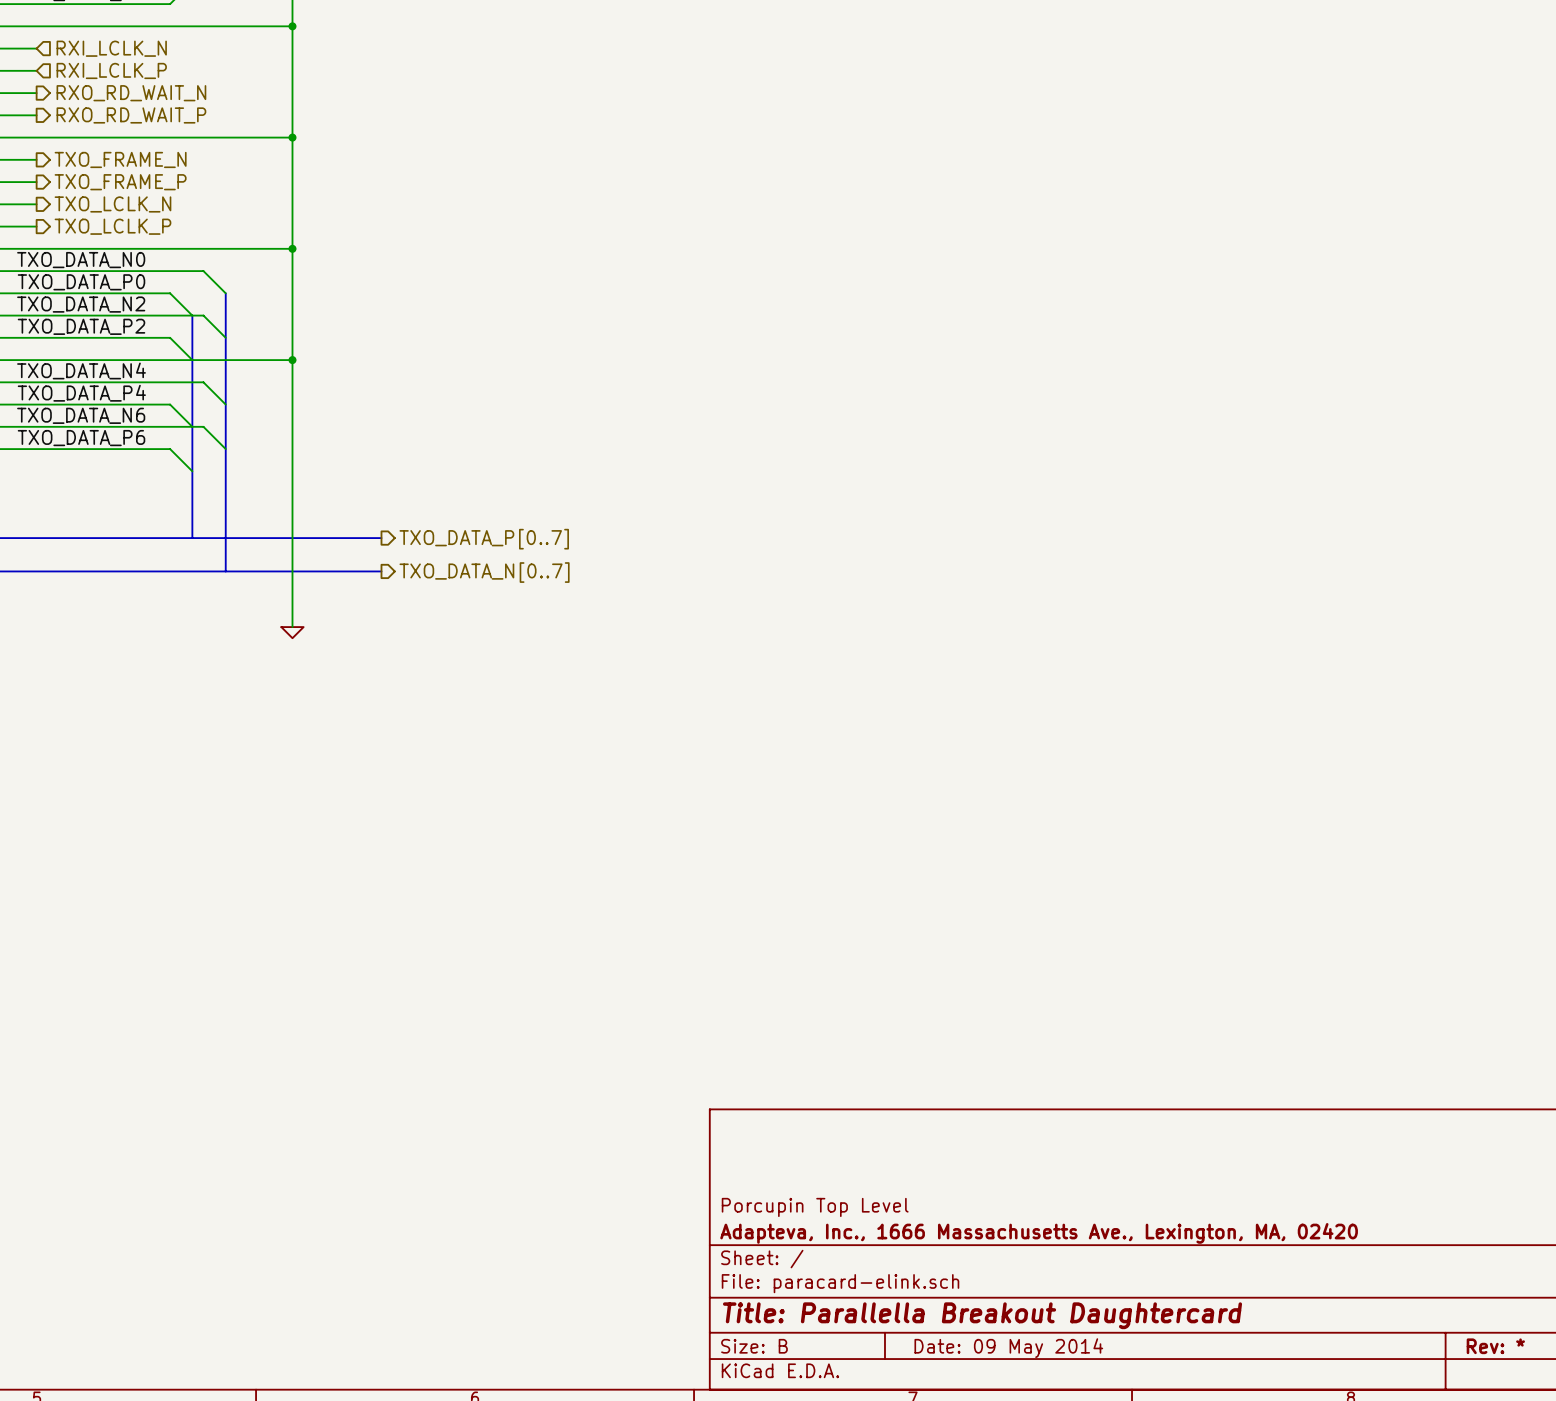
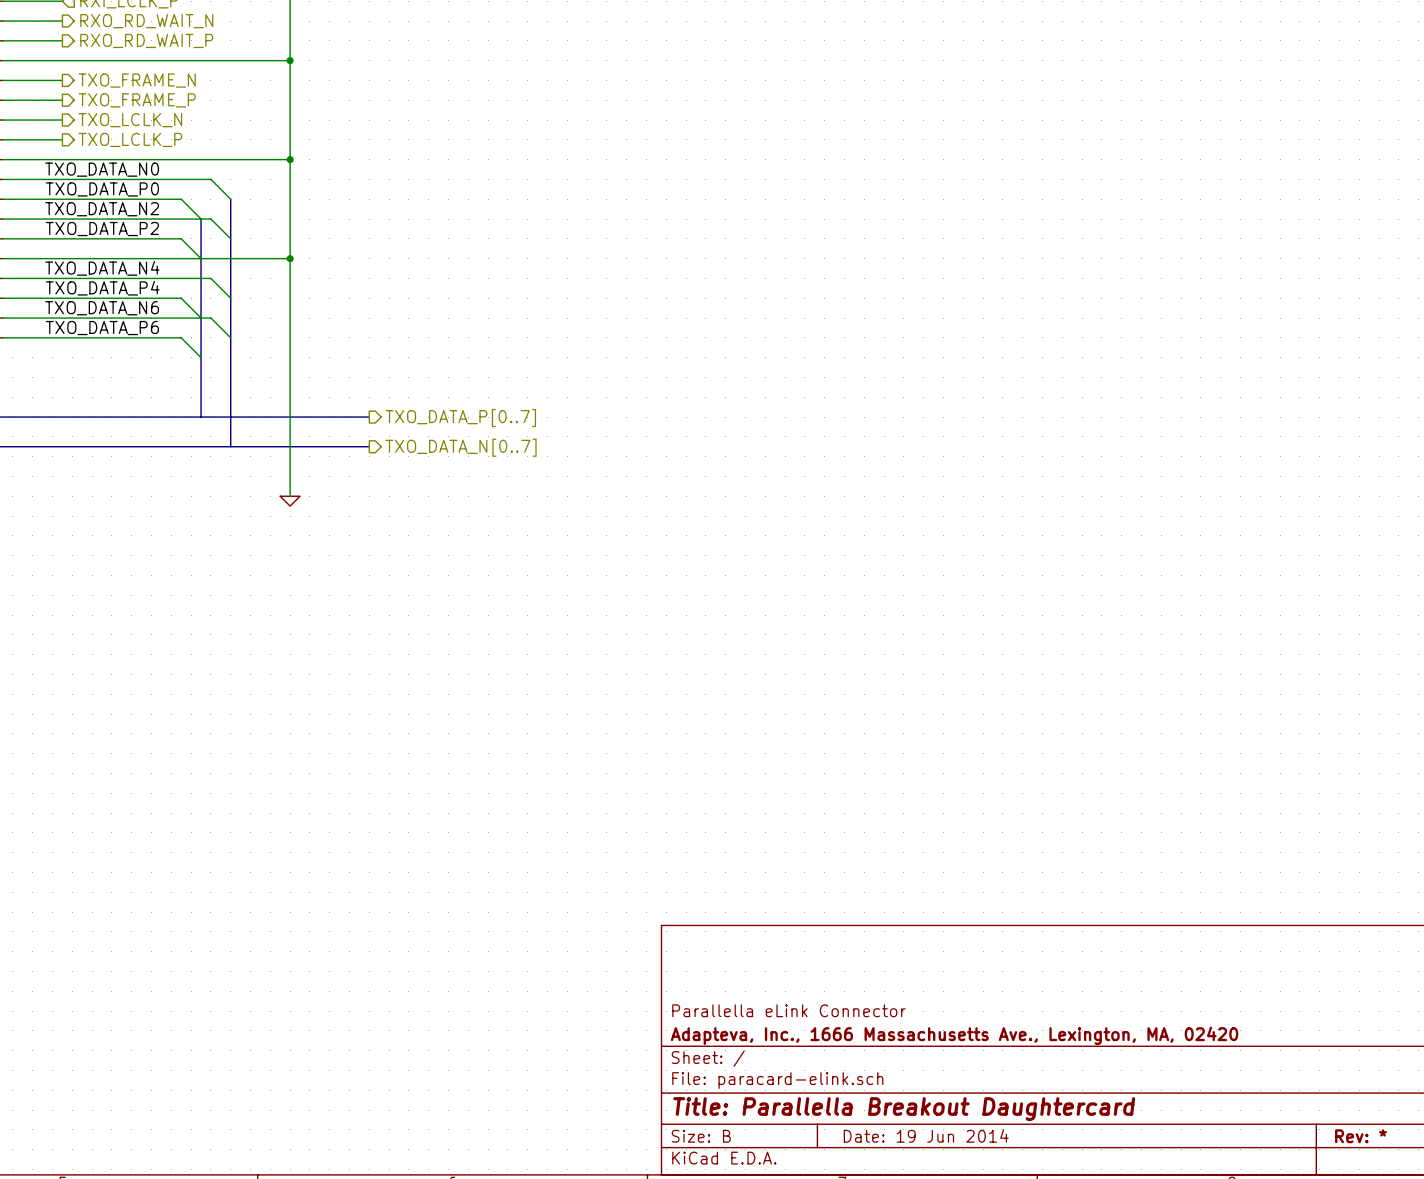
title block: Porcupin Top Level (815, 1207) -> Parallella eLink Connector (788, 1010)
title block: Date: 09 May 2014 (1008, 1348) -> Date: 19 Jun 2014 (926, 1135)

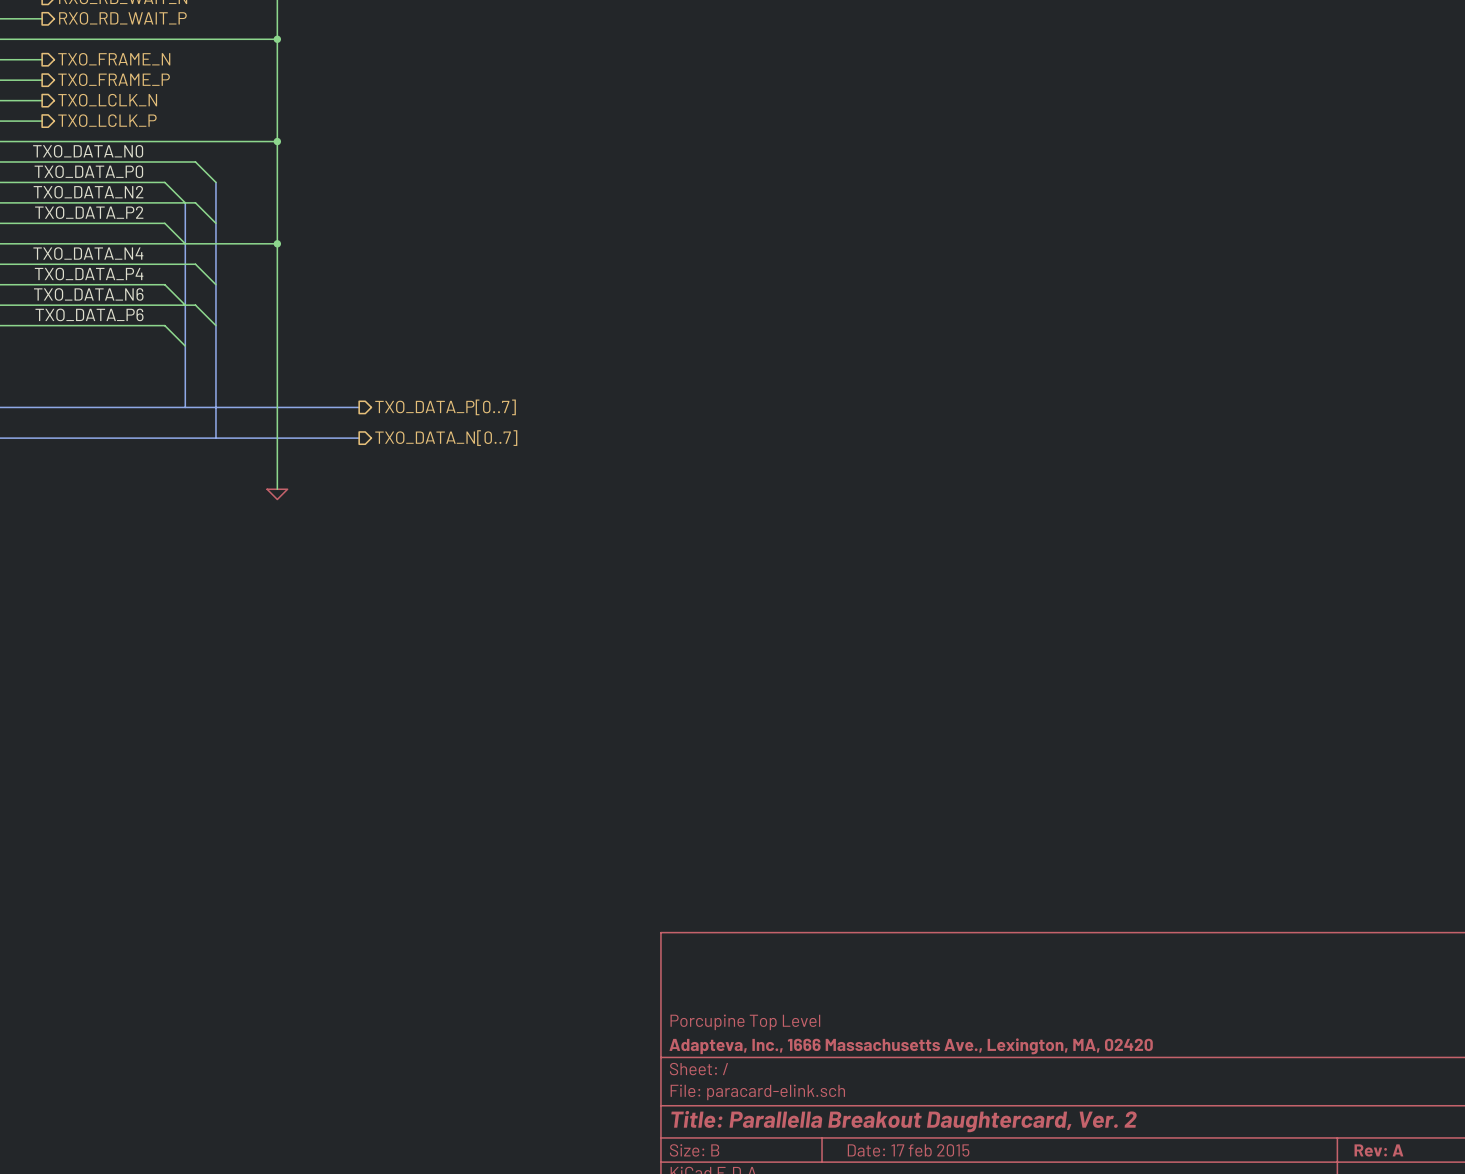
title block: Parallella eLink Connector (788, 1010) -> Porcupine Top Level (745, 1022)
title block: Title: Parallella Breakout Daughtercard (904, 1109) -> Title: Parallella Breakout Daughtercard, Ver. 2 (904, 1121)
title block: Date: 19 Jun 2014 (926, 1135) -> Date: 17 feb 2015 (908, 1150)
title block: Rev: * (1361, 1136) -> Rev: A (1378, 1150)

